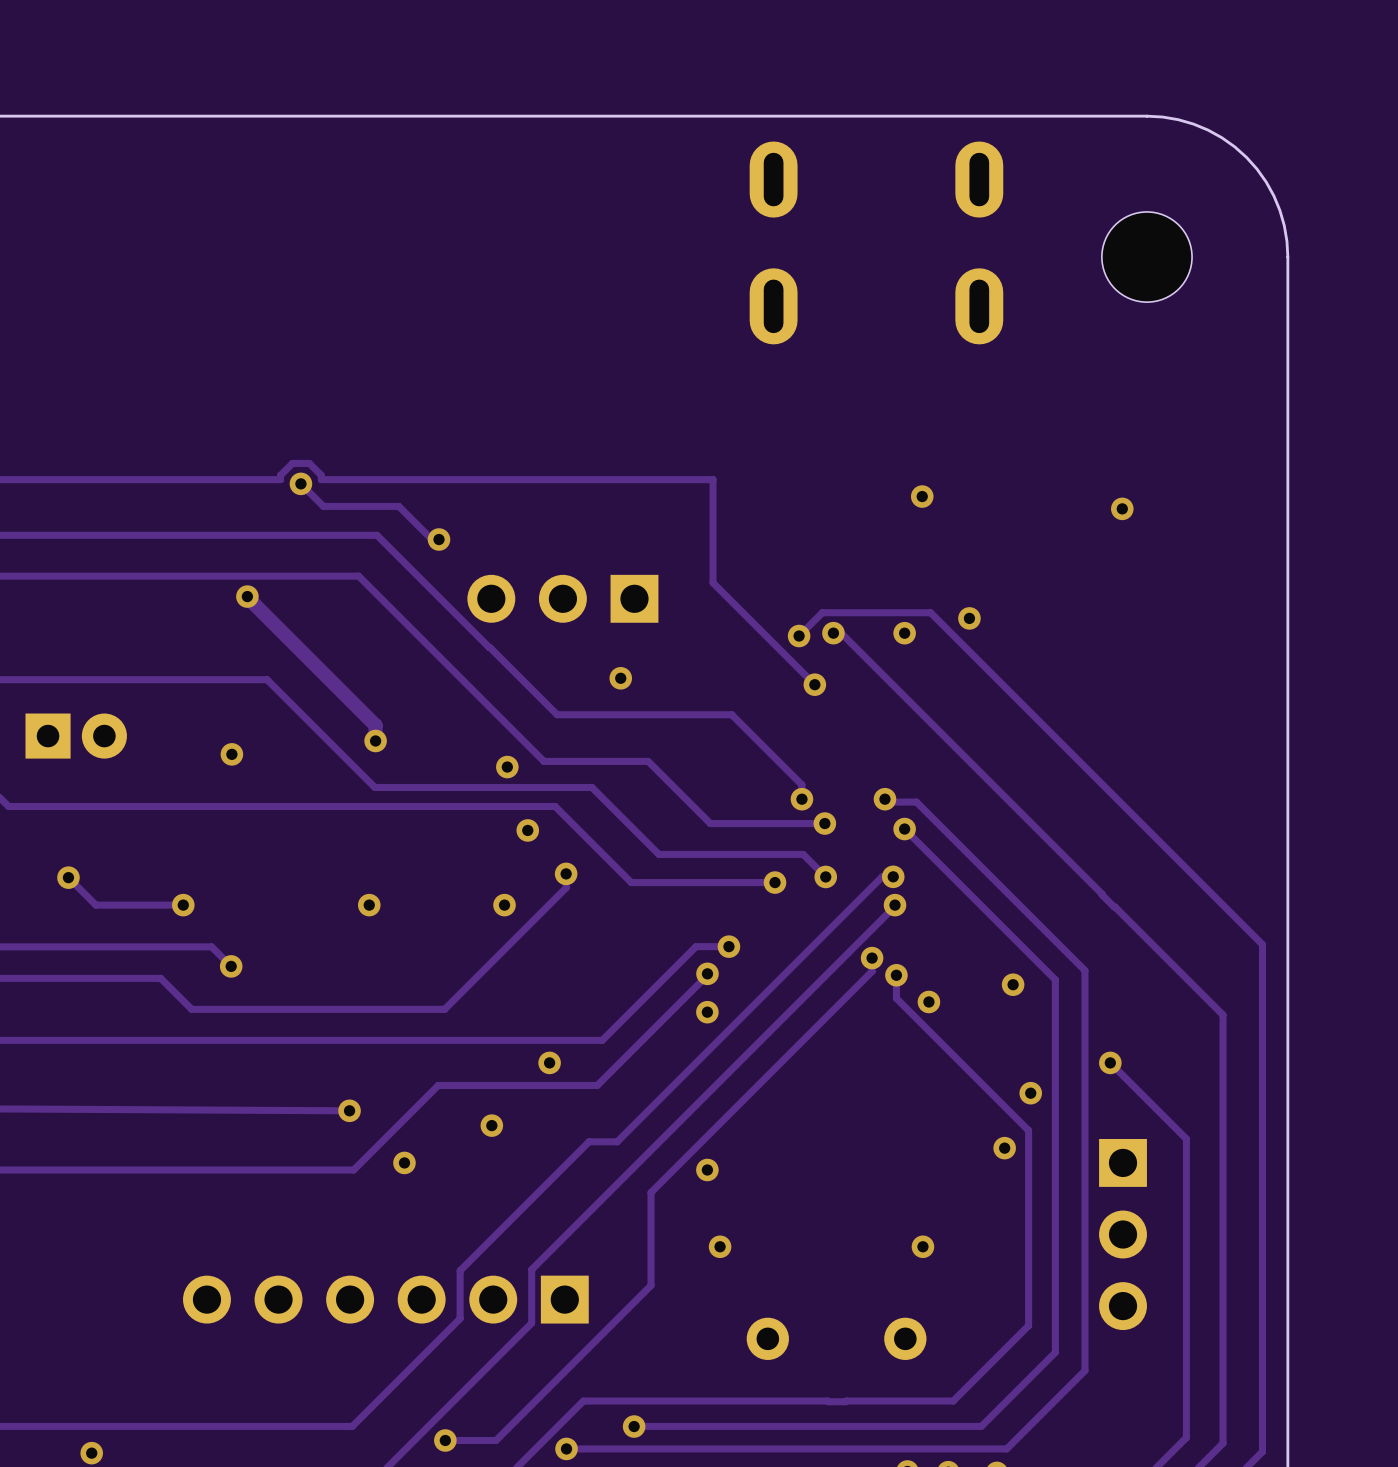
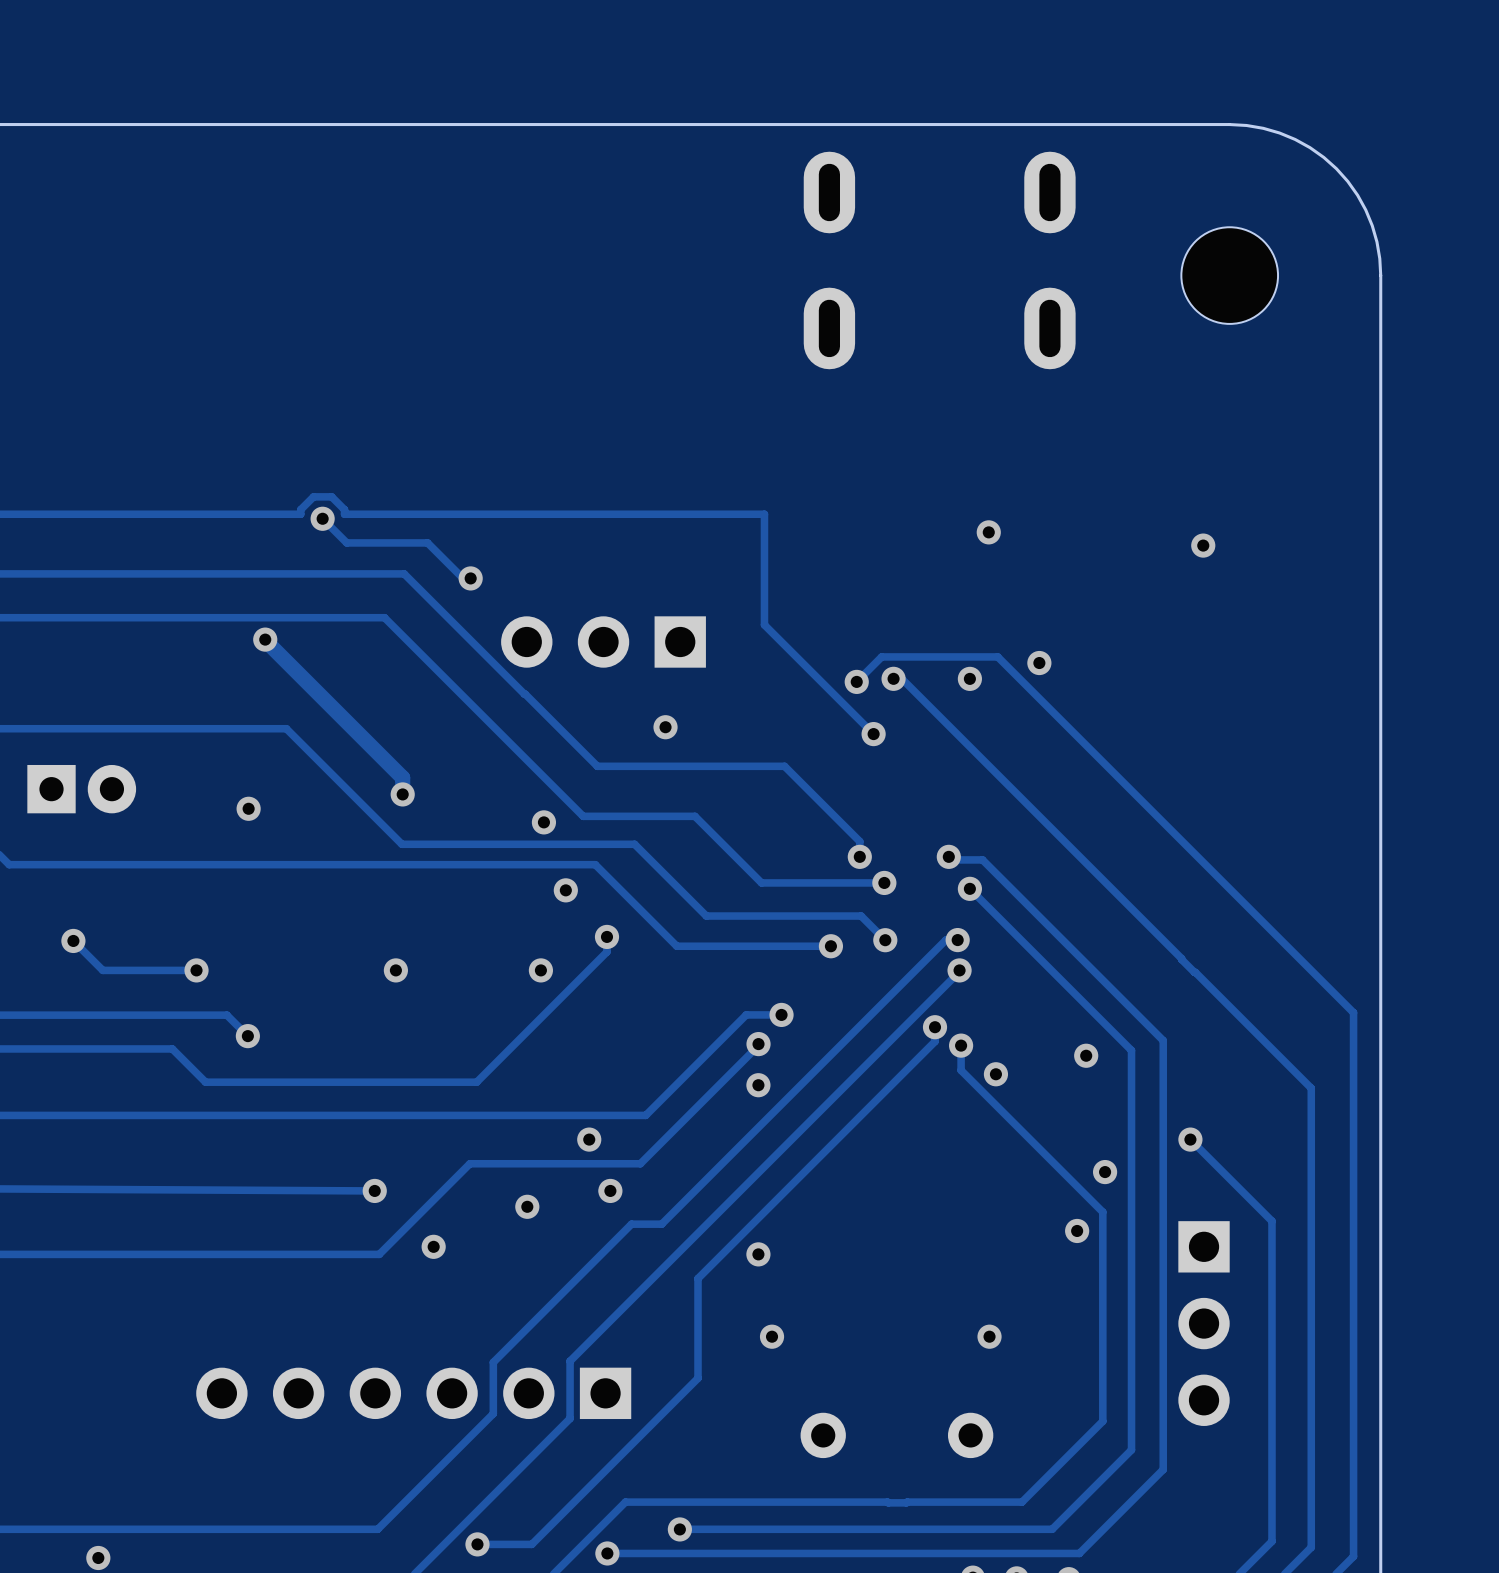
via: none -> (610, 1190)

